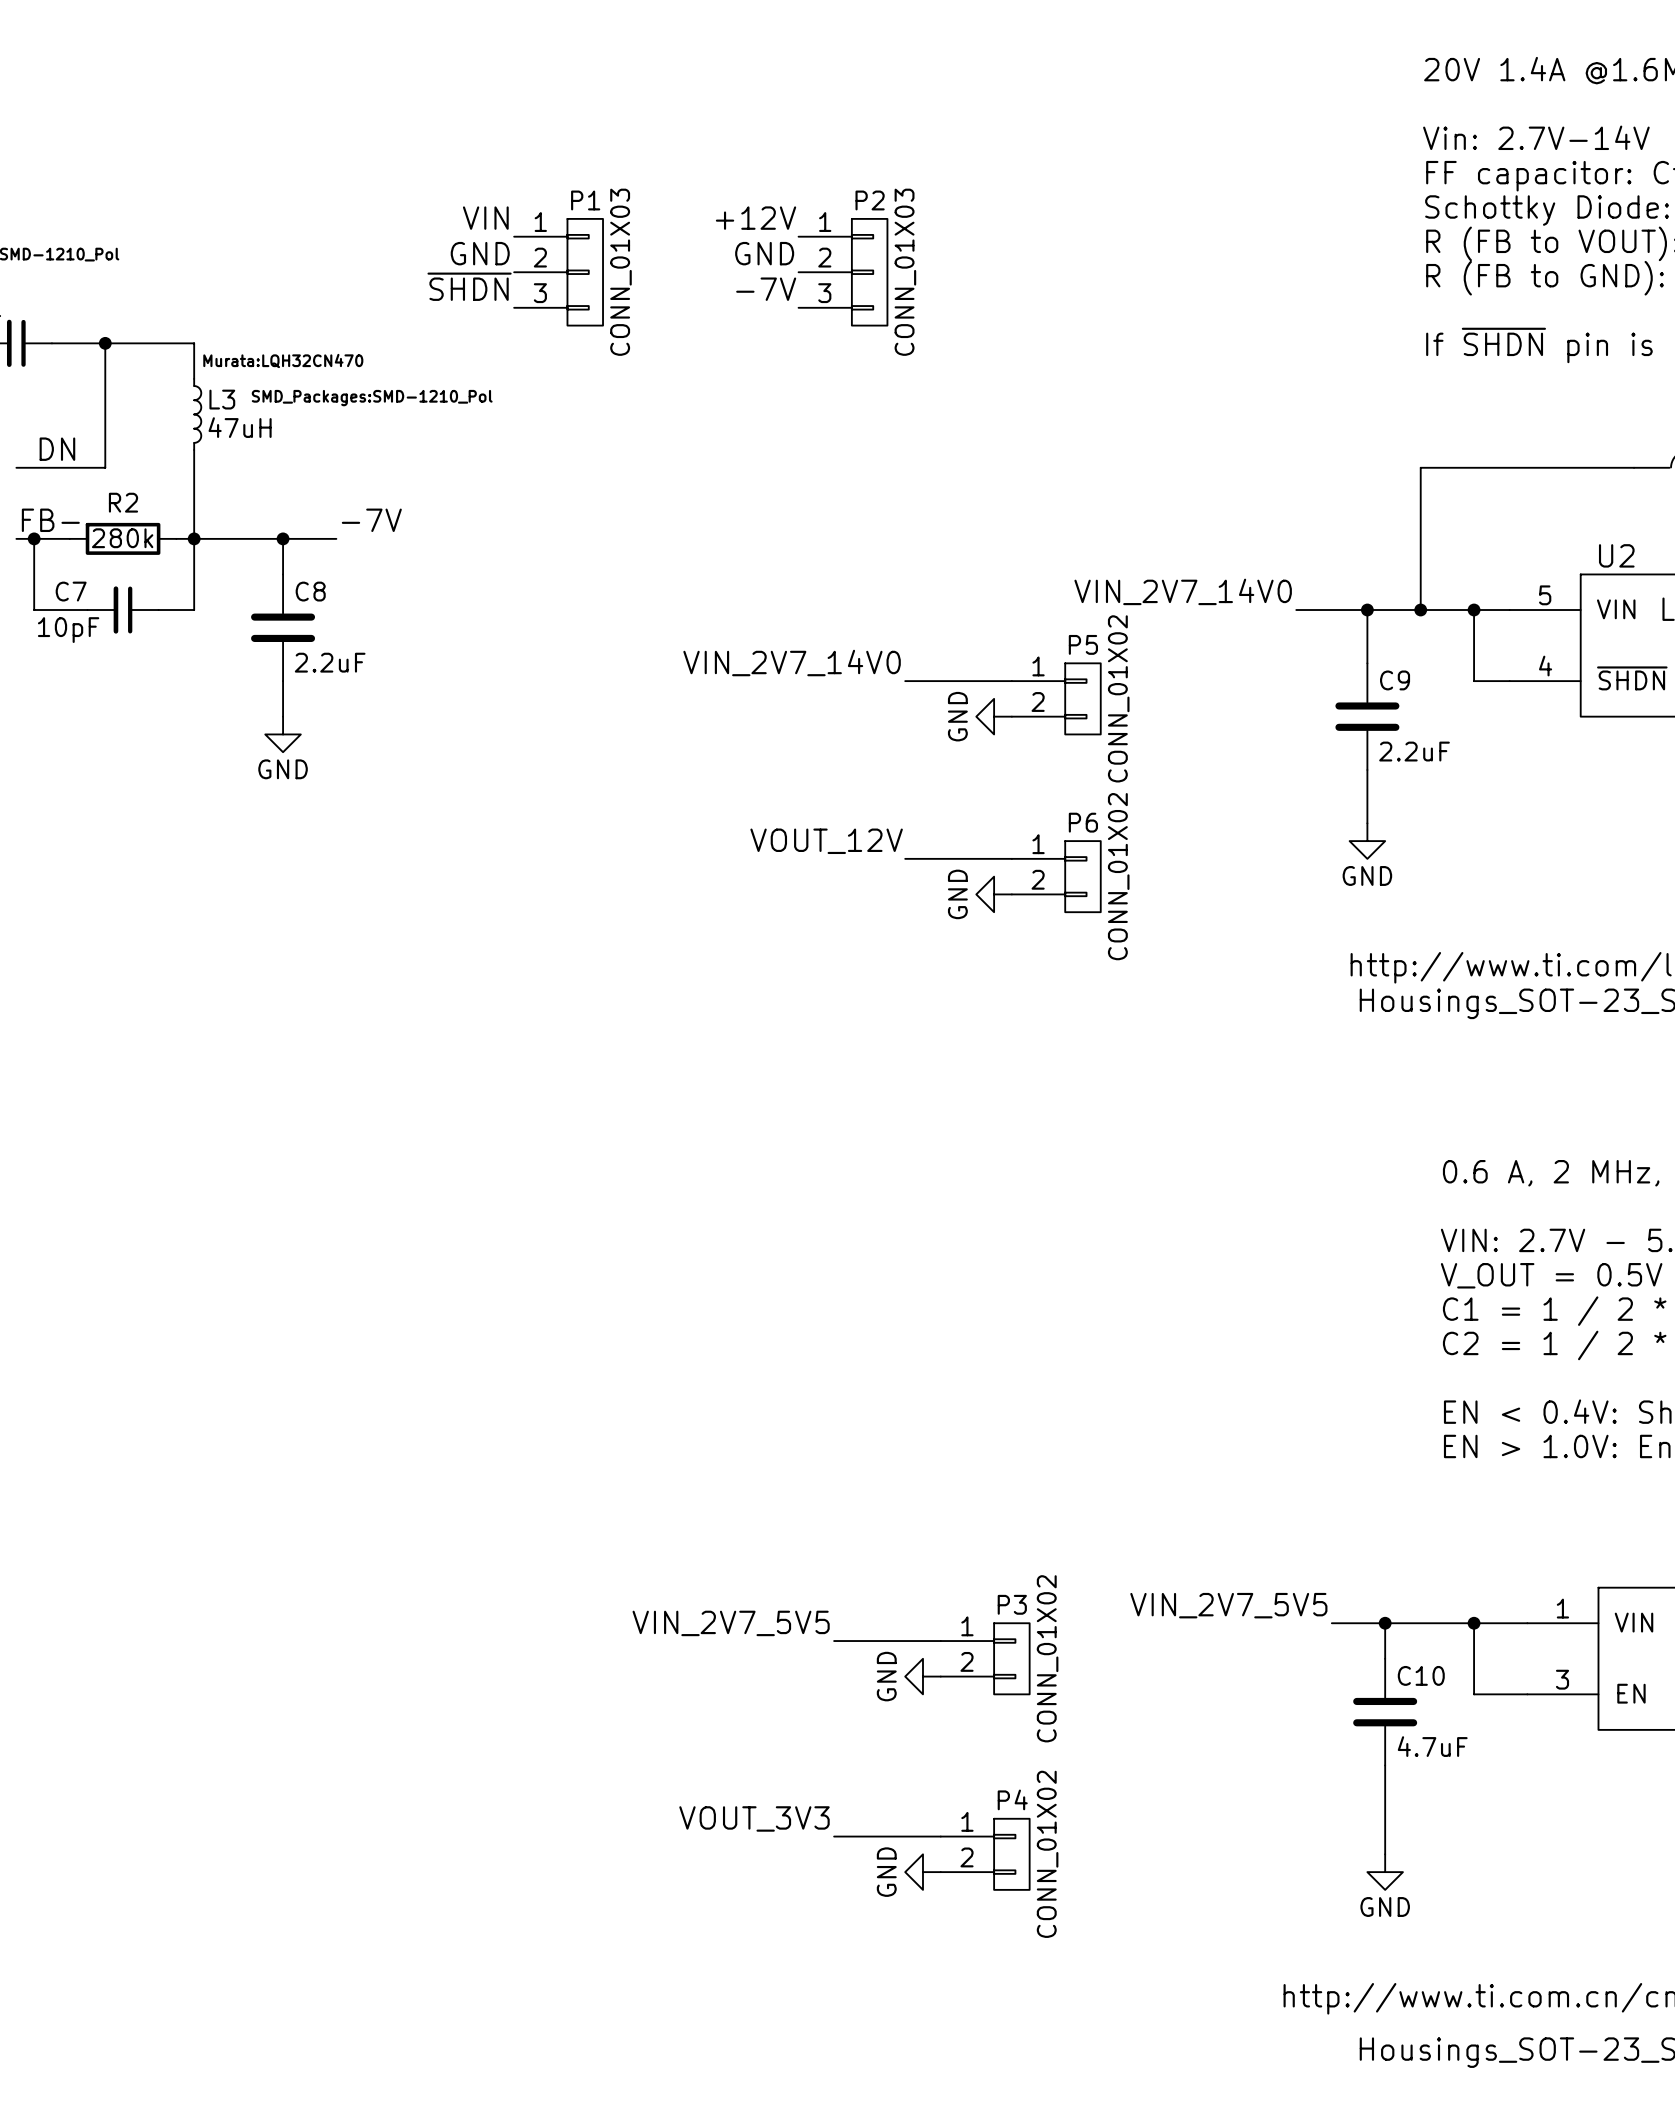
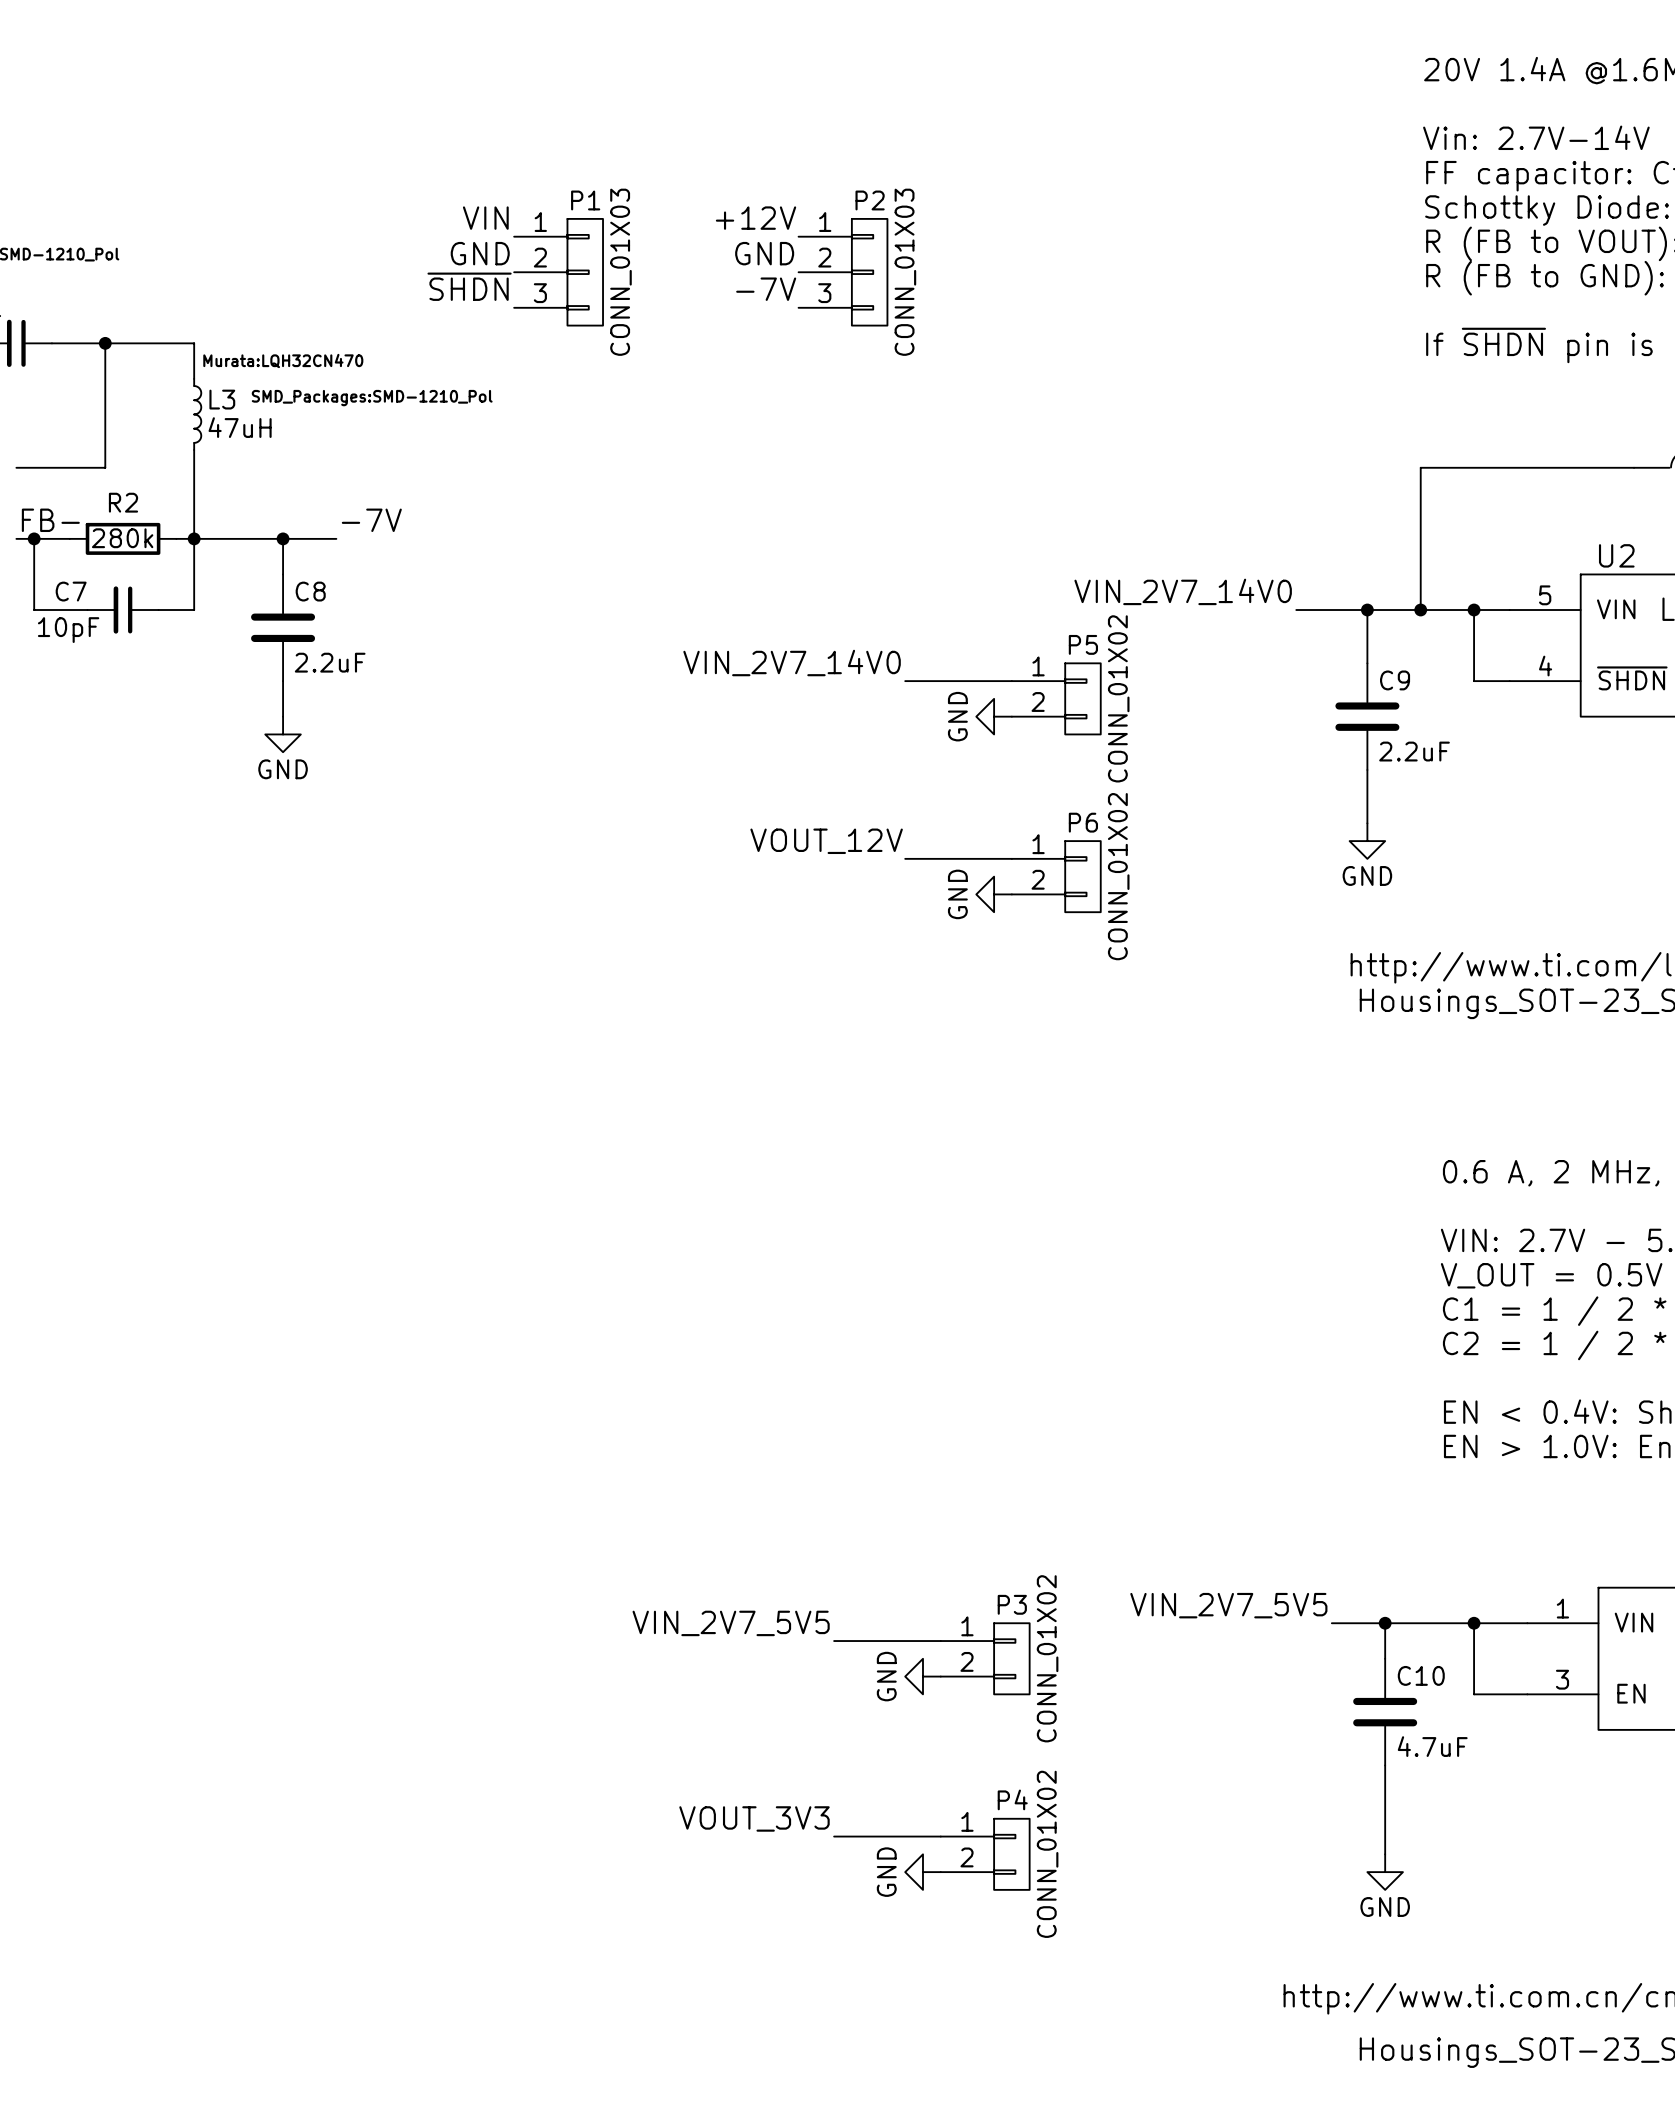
label: DN (57, 449) -> none

